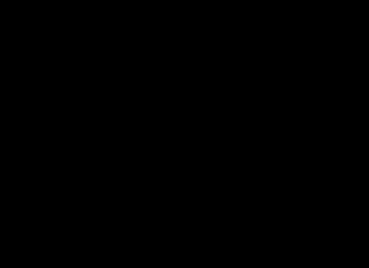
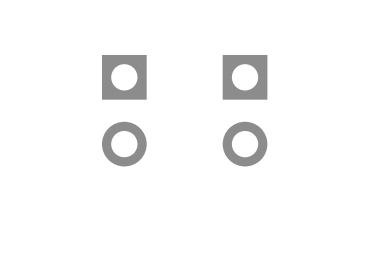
part: none -> (124, 110)
part: none -> (245, 110)

